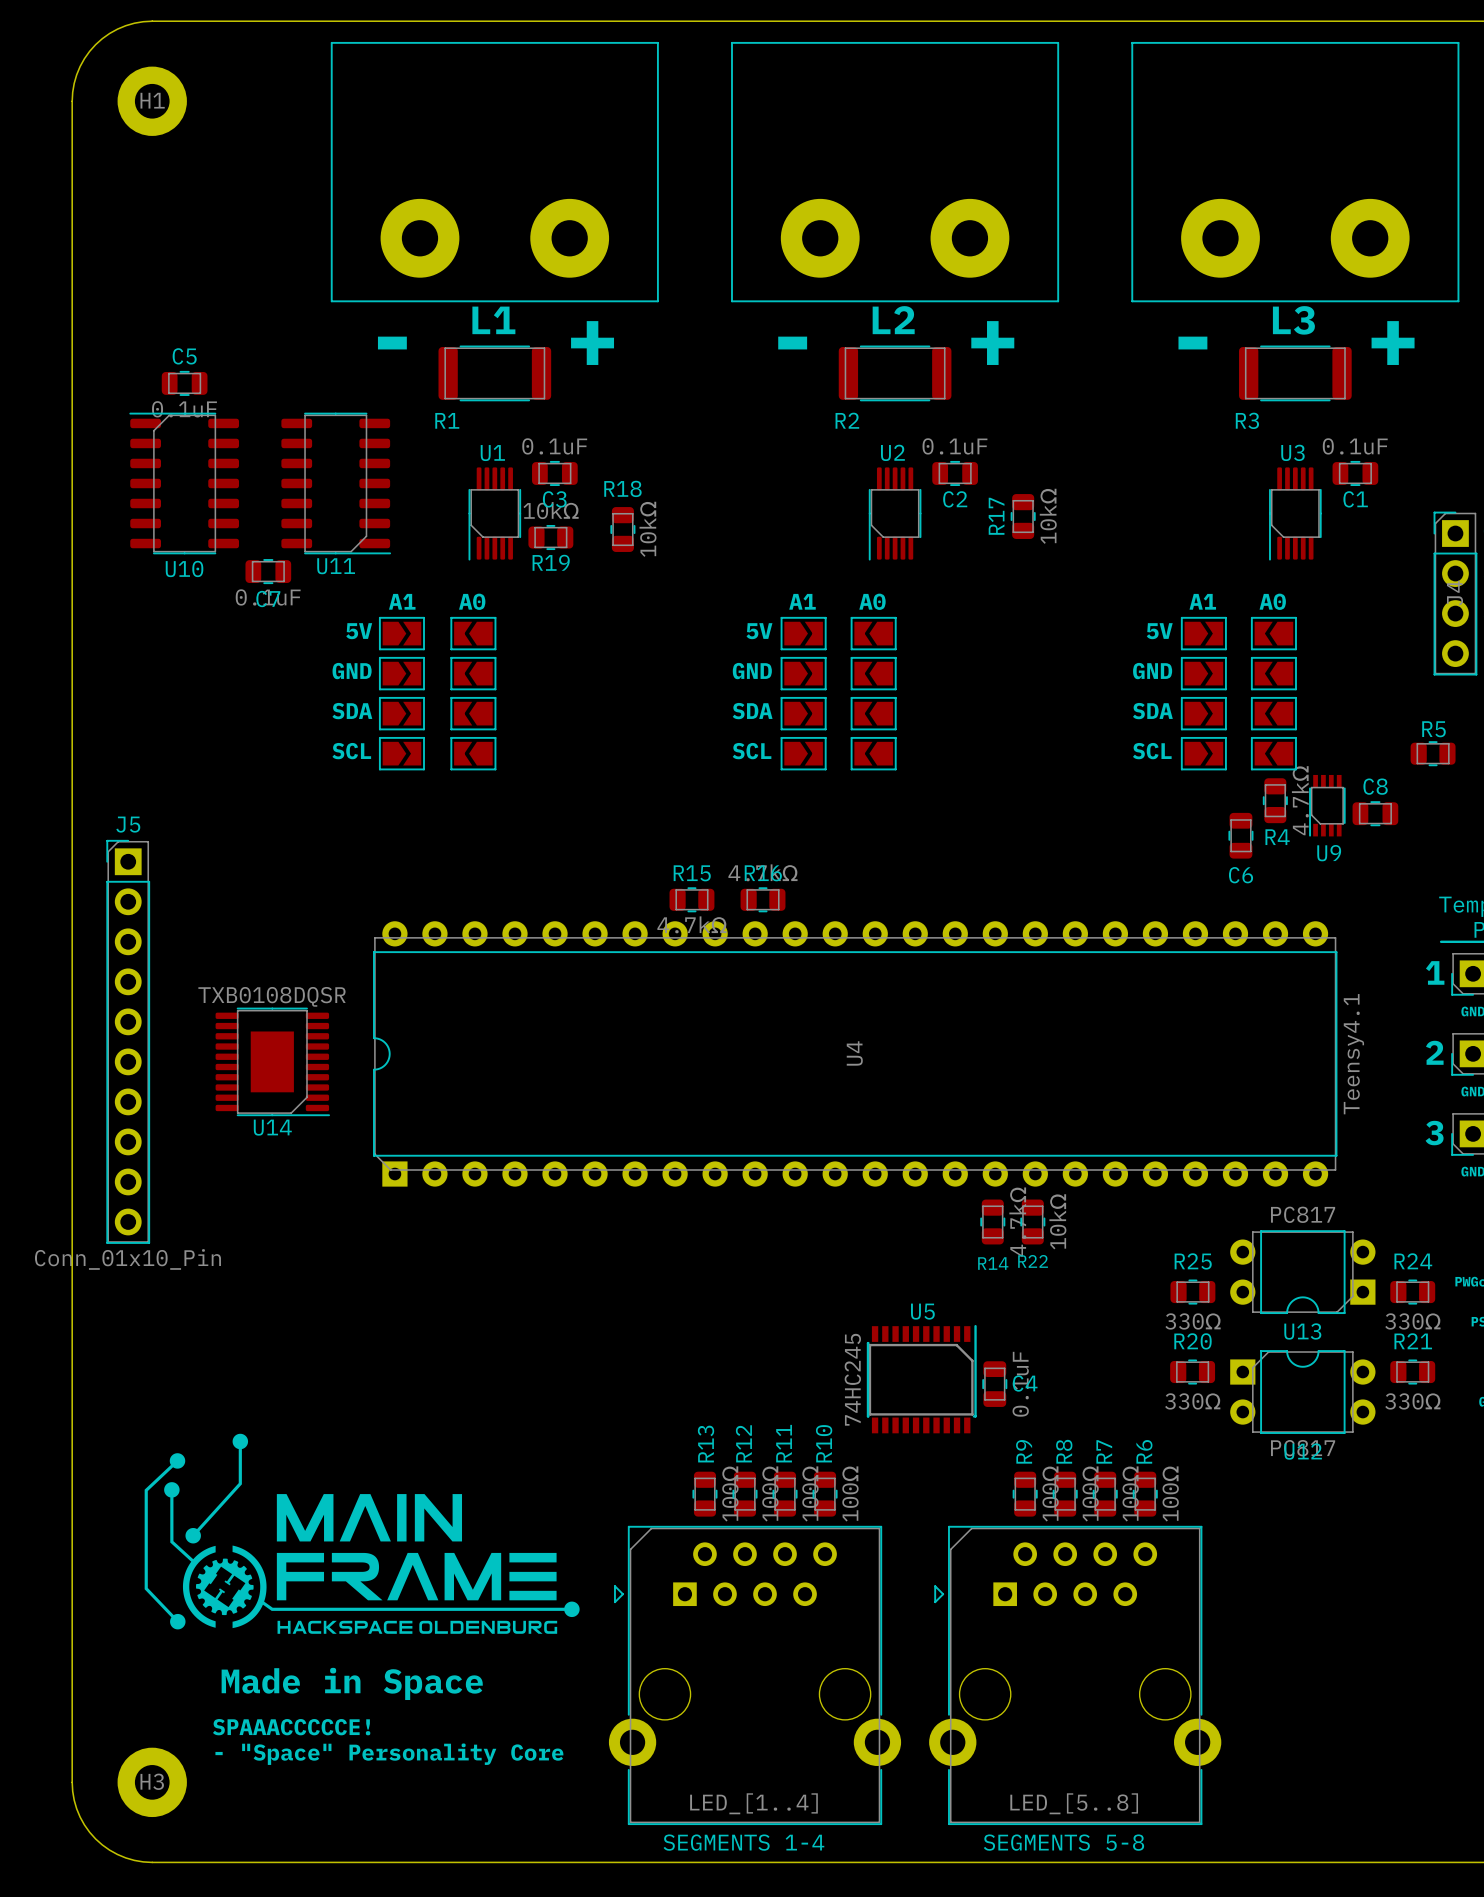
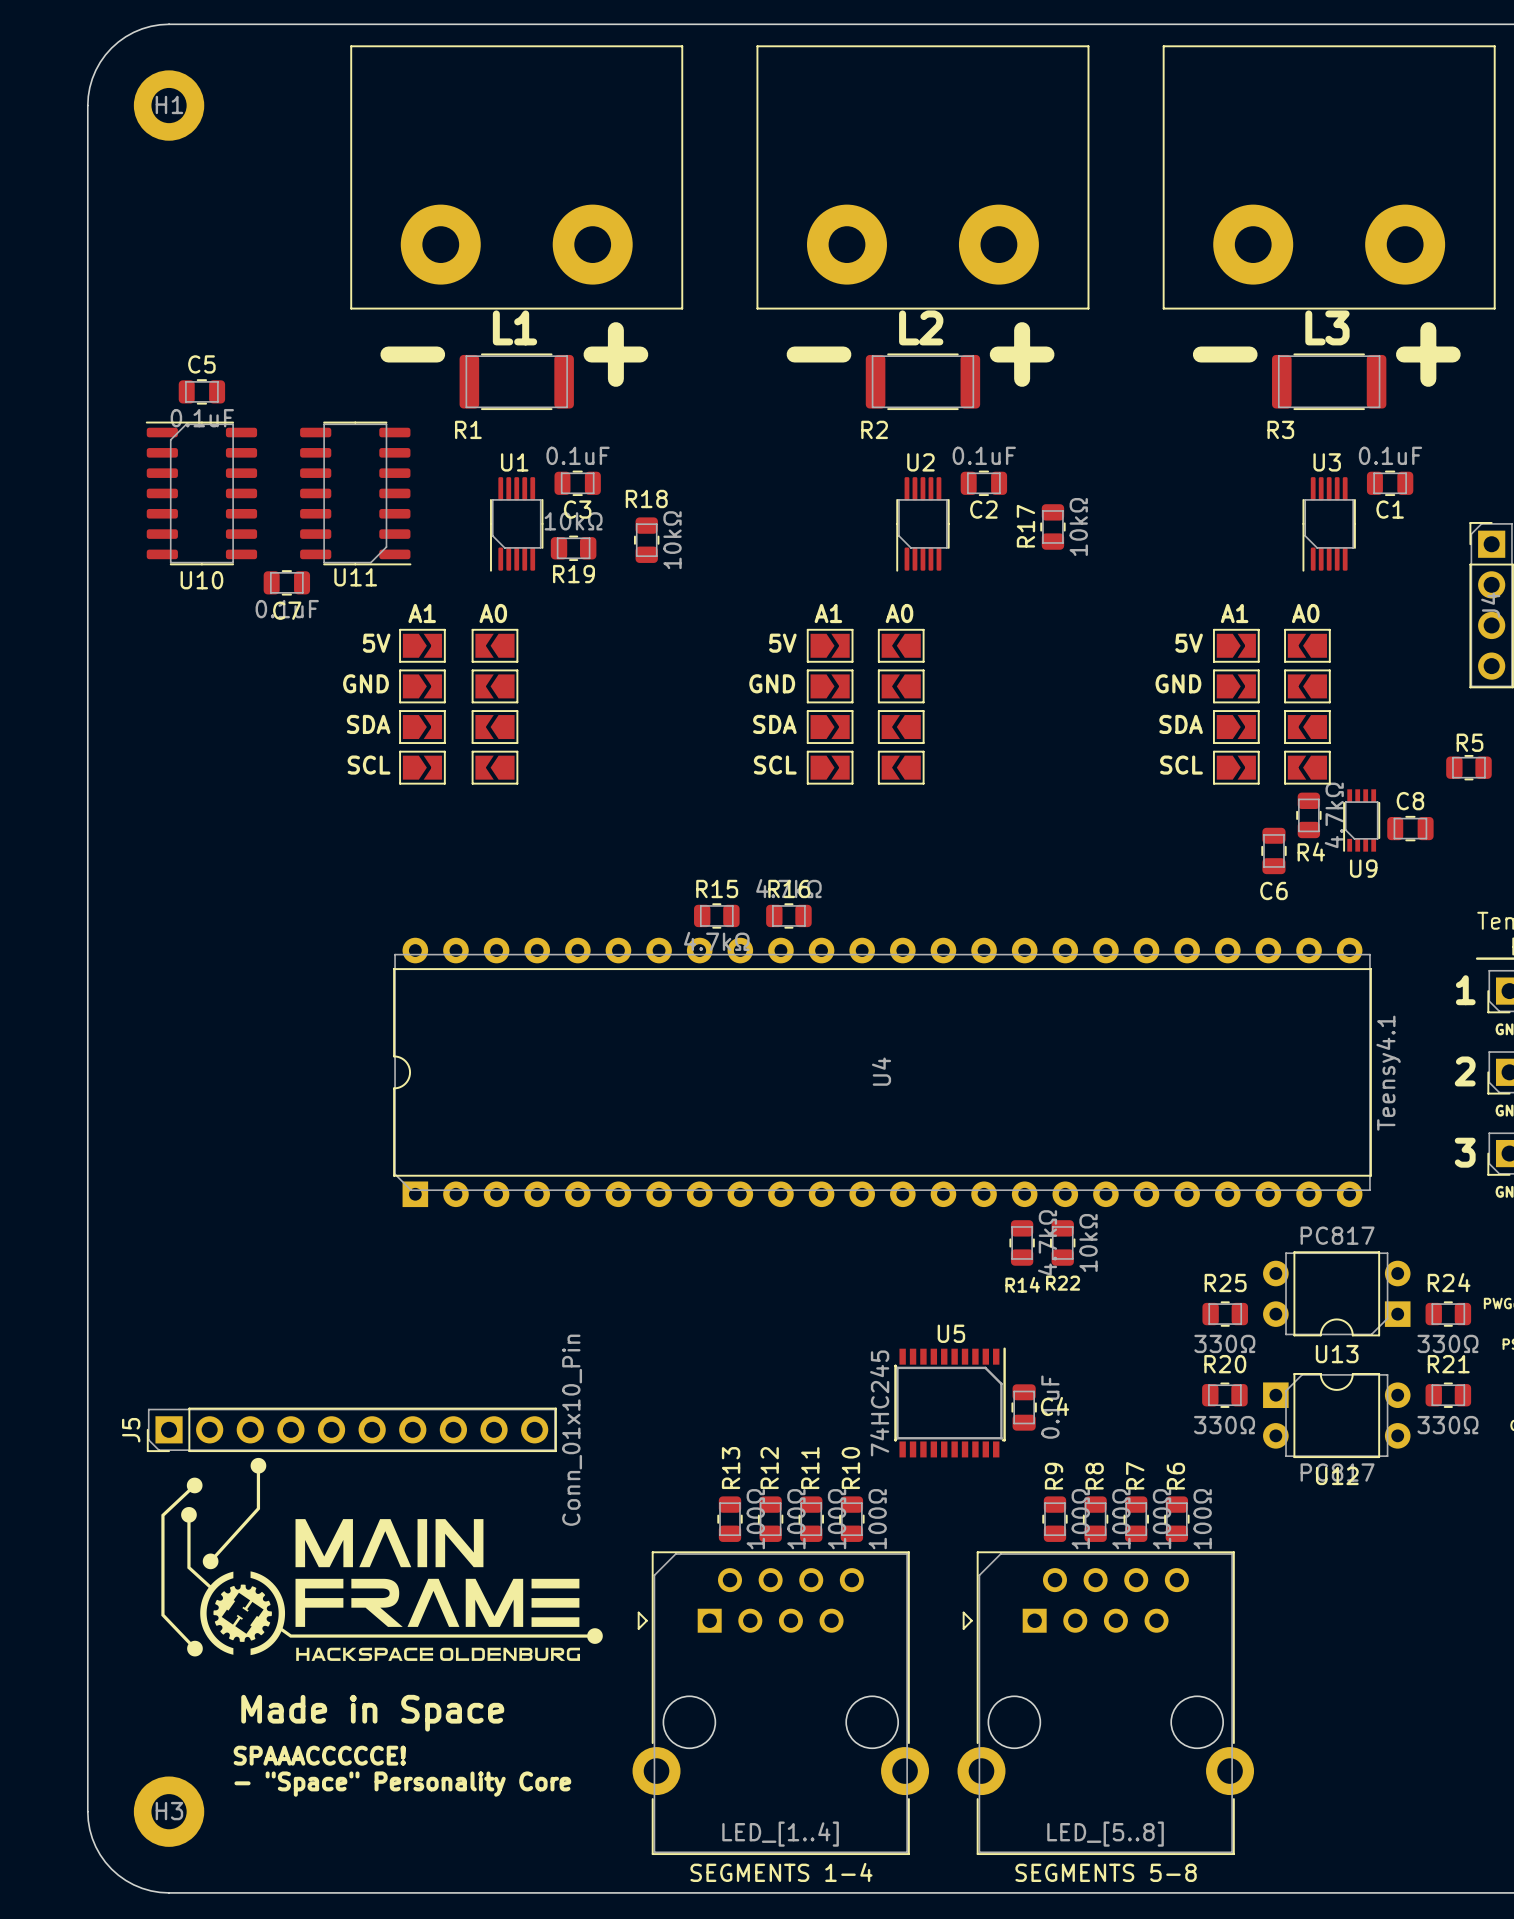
J5 rotation: 0° (128, 1041) -> 90° counterclockwise (351, 1429)
J5 position: (128, 1041) -> (351, 1429)
U14: TXB0108DQSR (272, 1061) -> none

